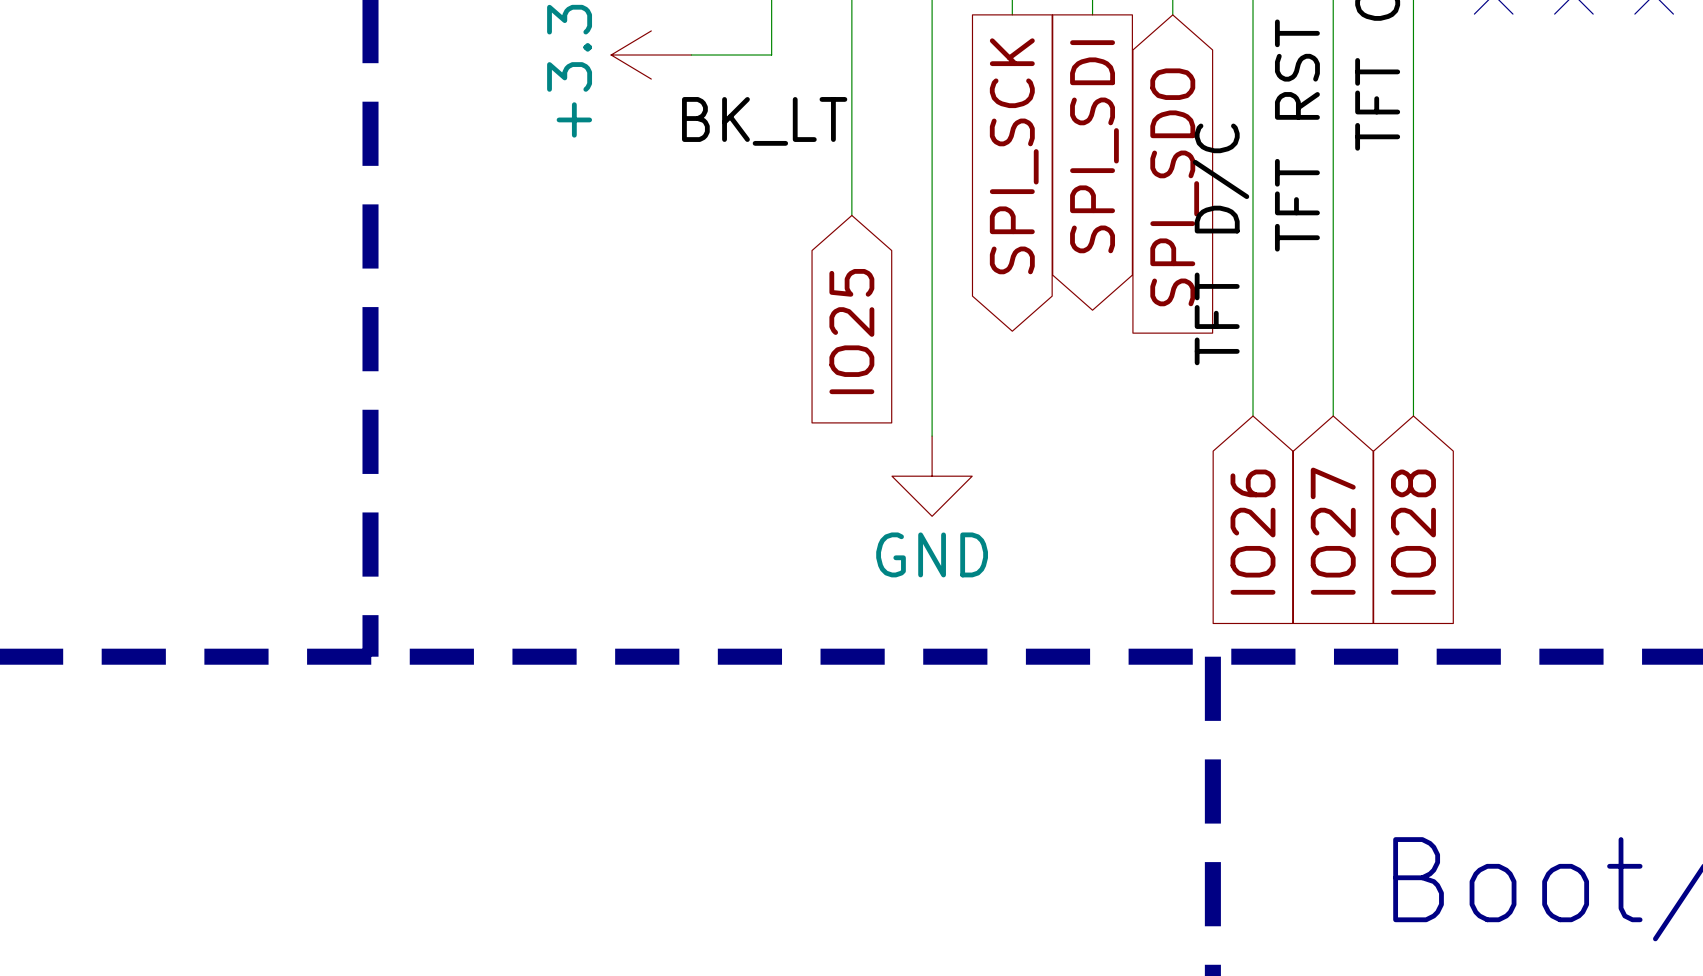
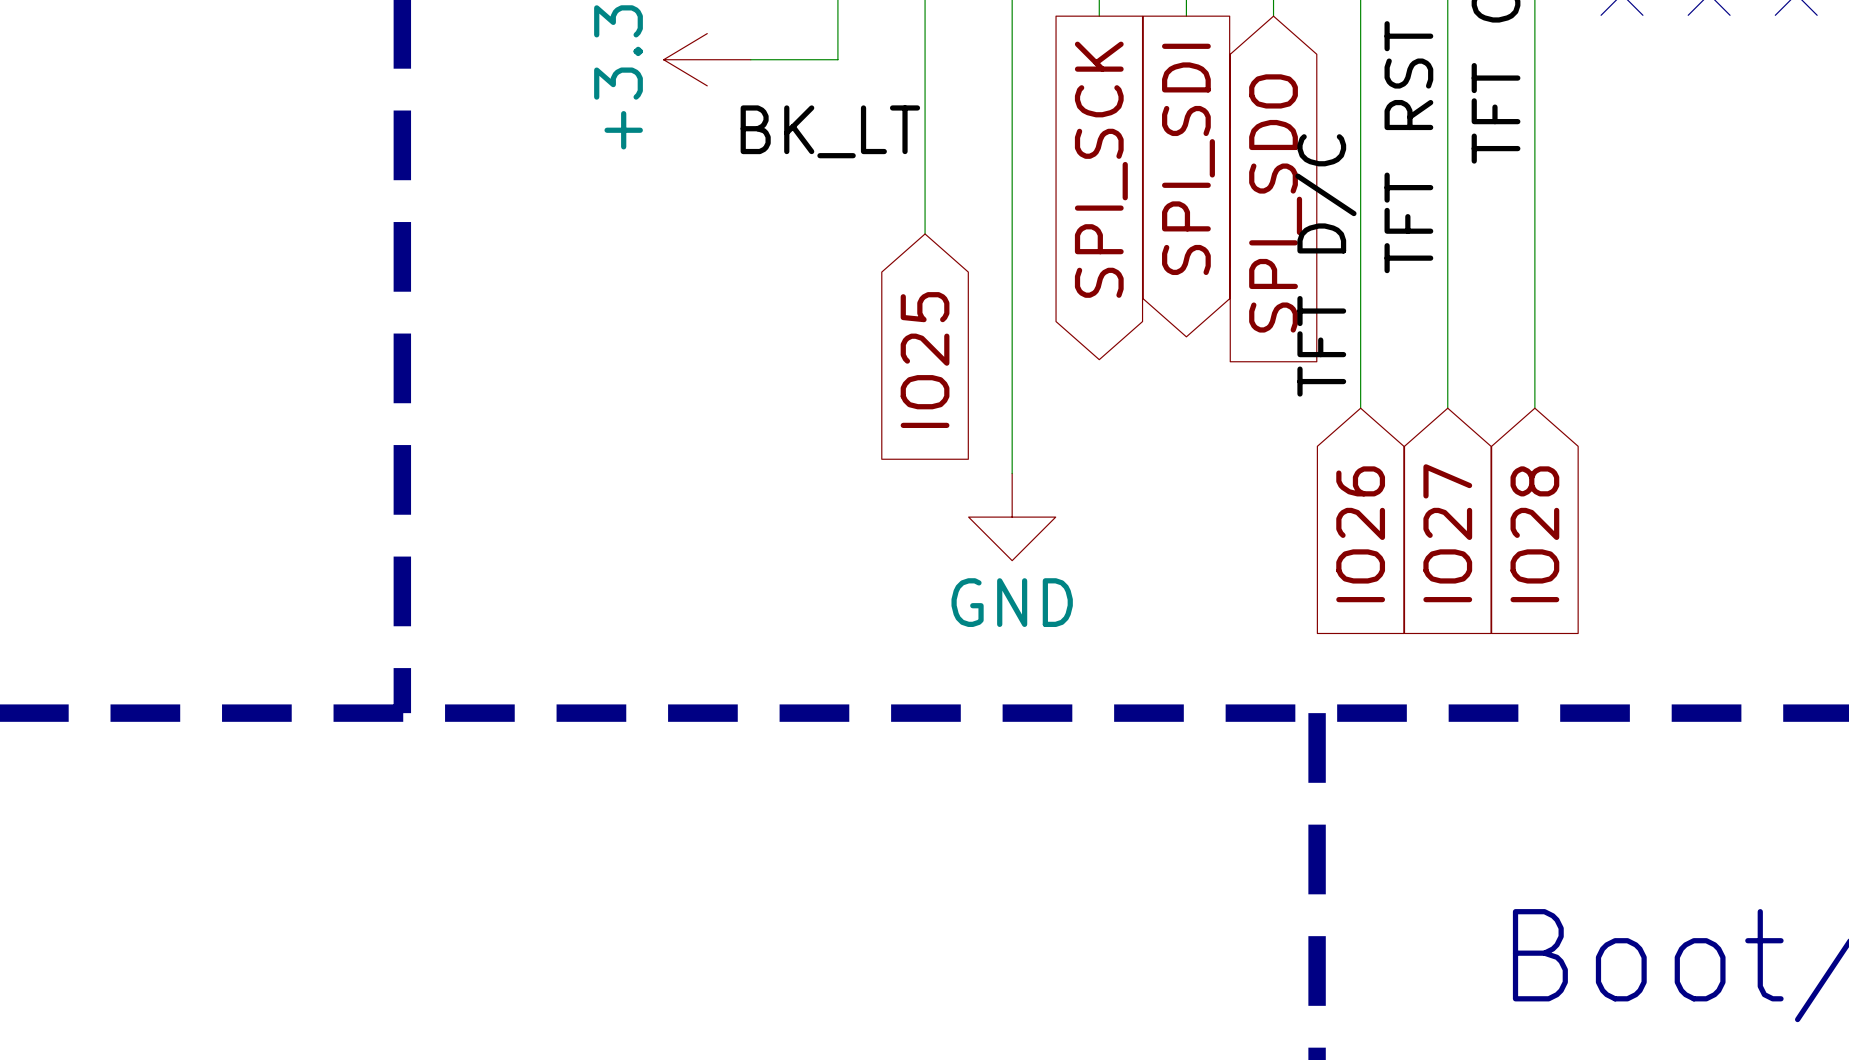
wire: (1253, 375) (1253, 416) -> none
wire: (1333, 375) (1333, 416) -> none
wire: (1413, 375) (1413, 416) -> none
global label position: IO27 (1333, 531) -> IO27 (1447, 533)
global label position: IO26 (1253, 532) -> IO26 (1360, 534)
global label position: IO28 (1413, 532) -> IO28 (1534, 534)

